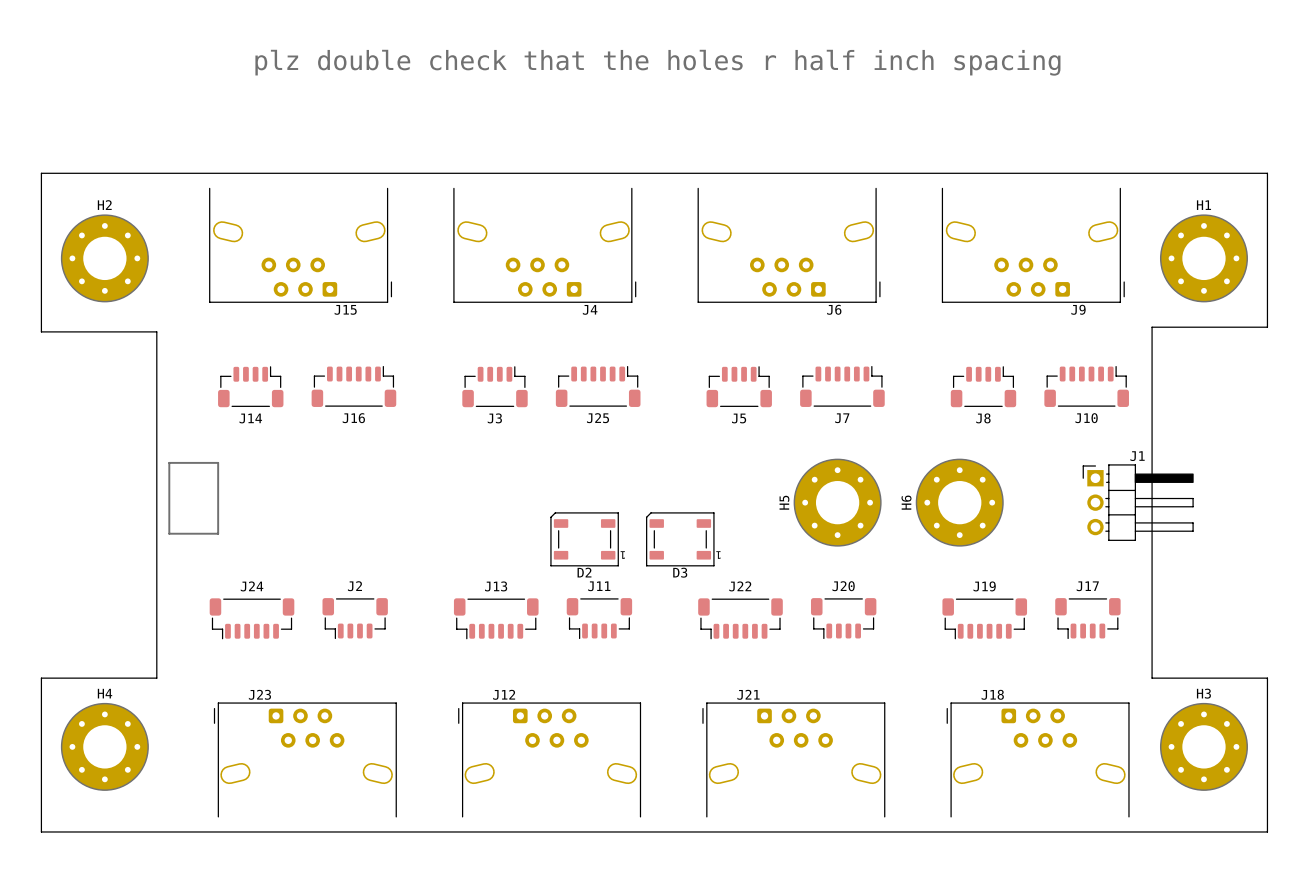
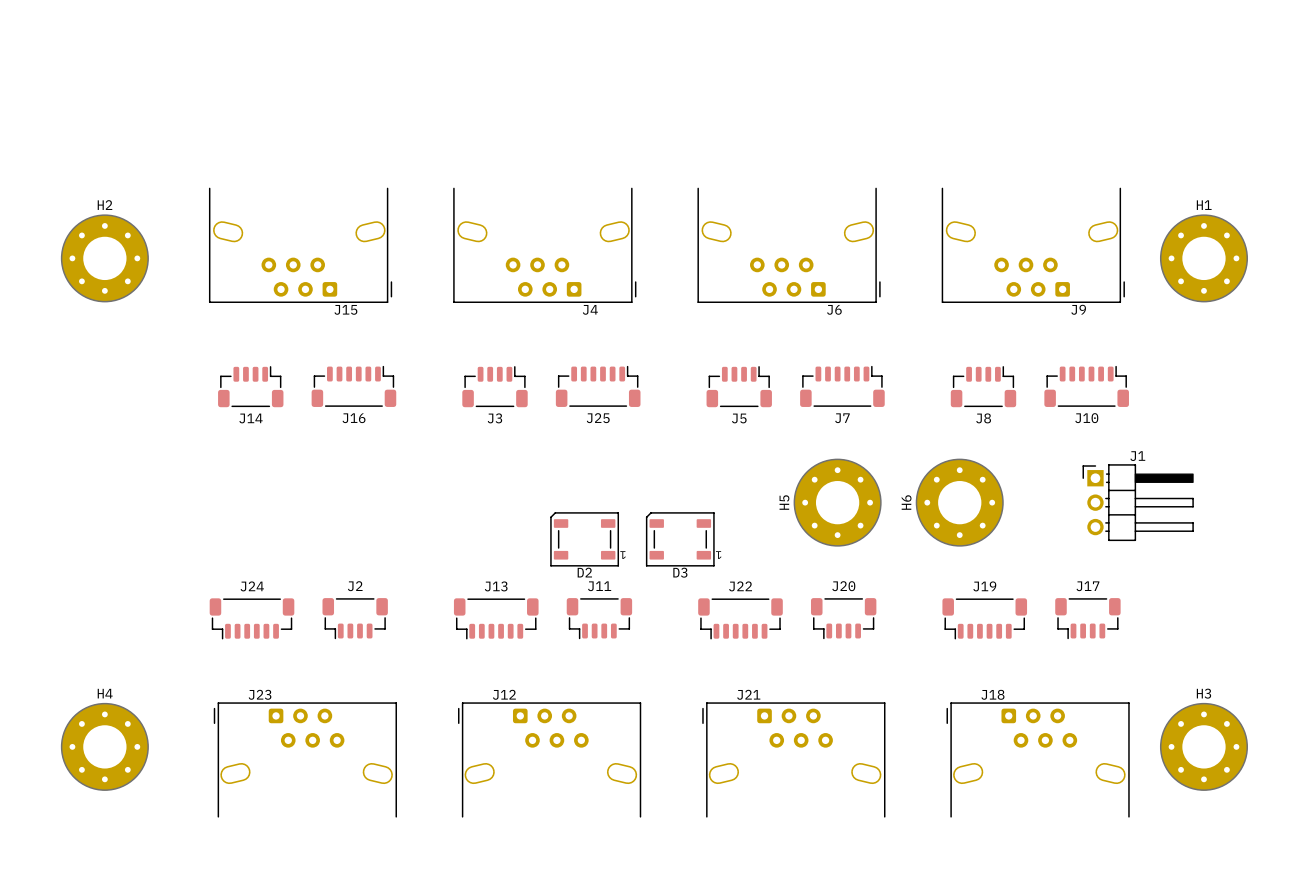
text: plz double check that the holes r half inch spacing (657, 62) -> none
board edge: (156, 331) (41, 331) (41, 173) (1267, 173) (1267, 327) (1152, 327) (1152, 678) (1267, 678) (1267, 831) (41, 831) (41, 678) (156, 678) (156, 331) -> none
part: (193, 498) -> none

